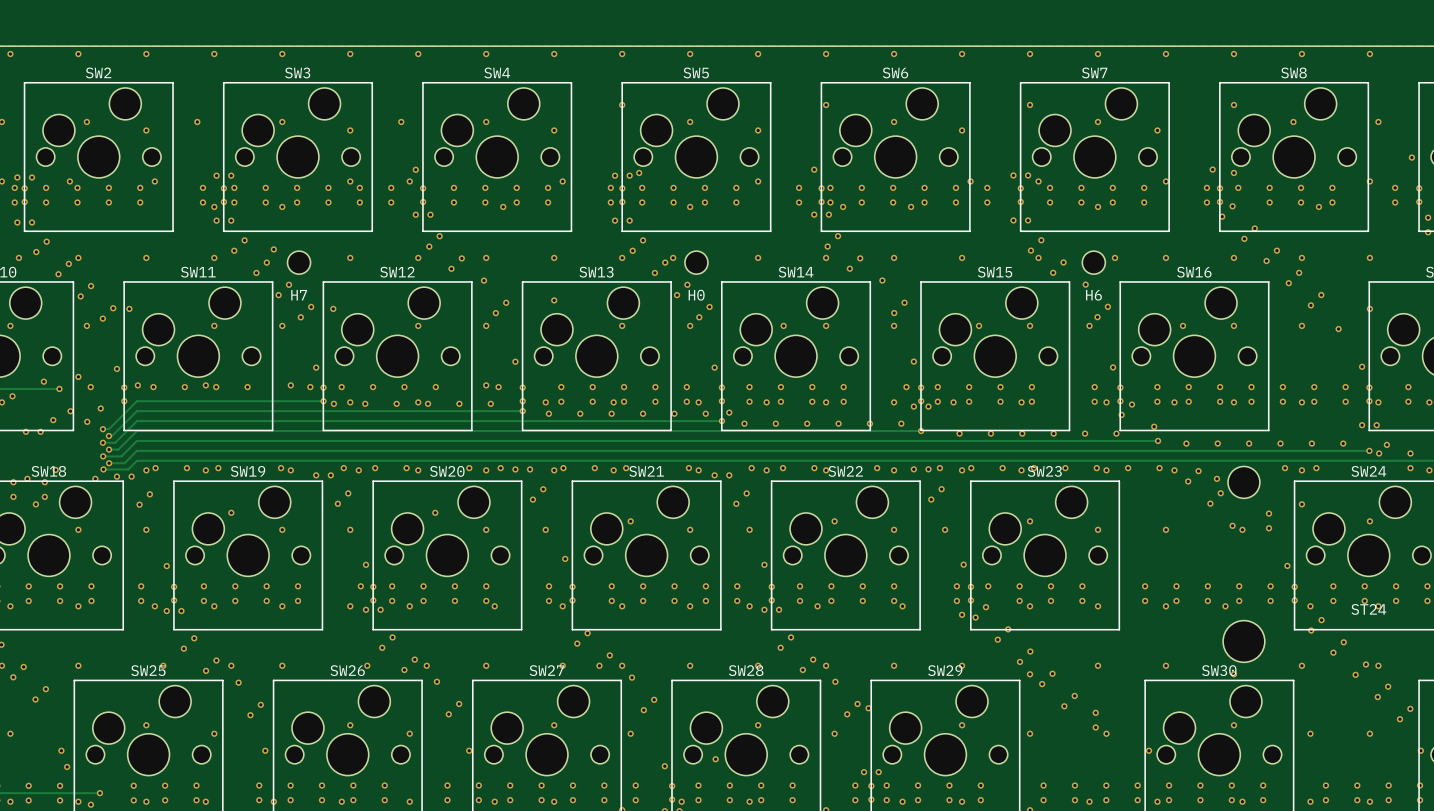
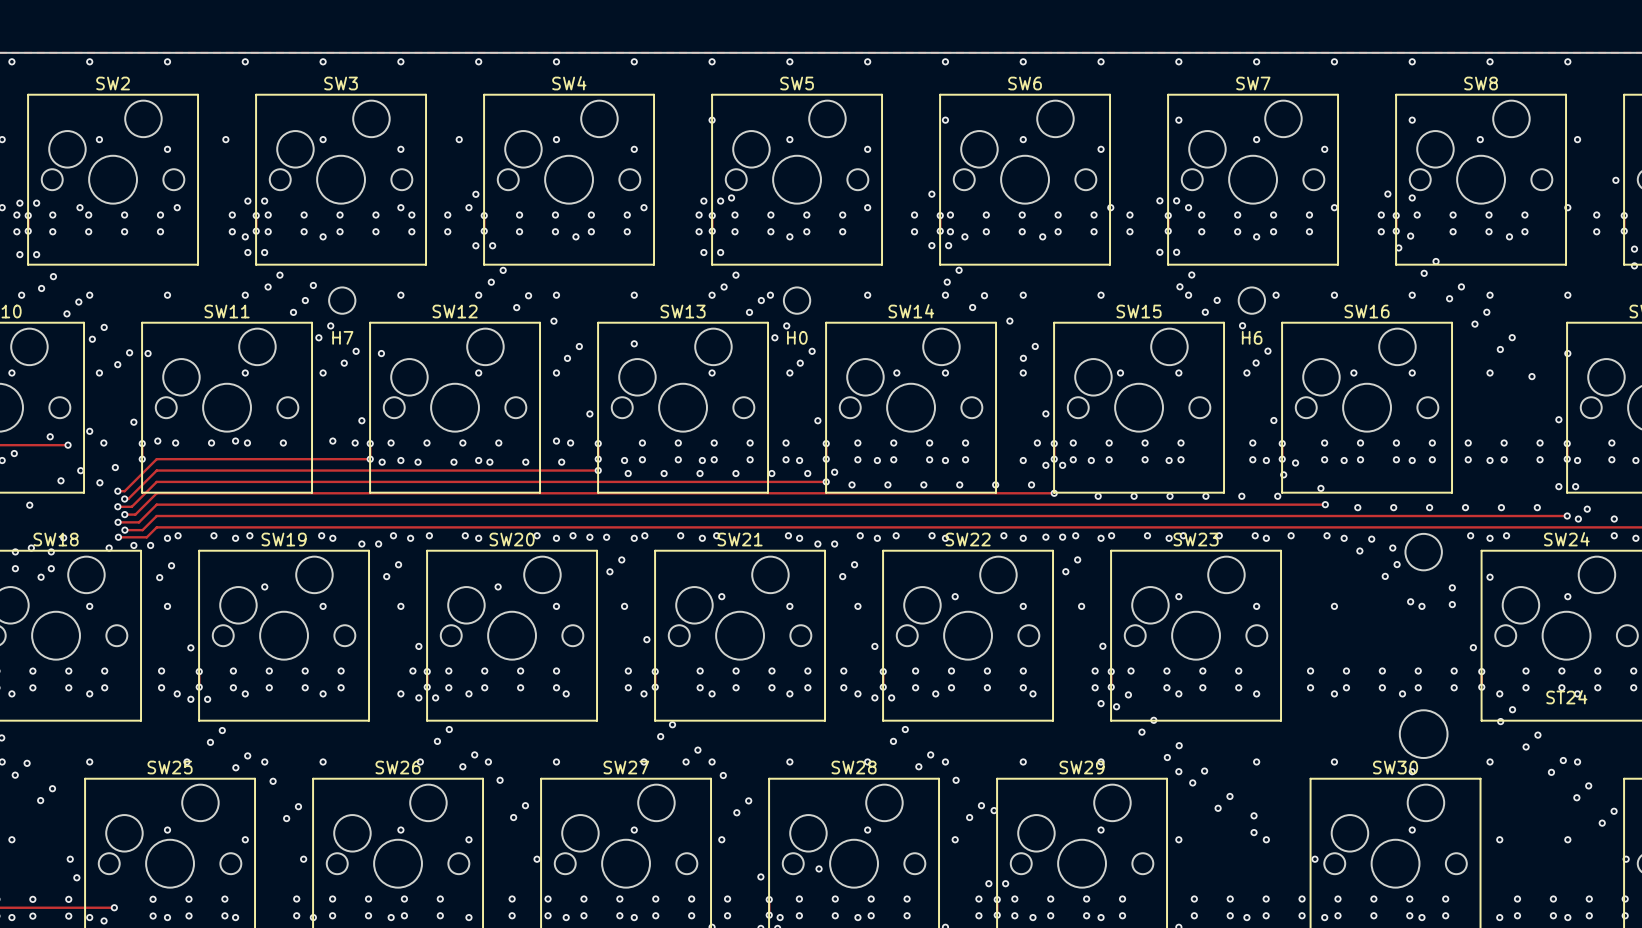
via: (25, 431) -> none
via: (40, 431) -> none
via: none -> (29, 505)

